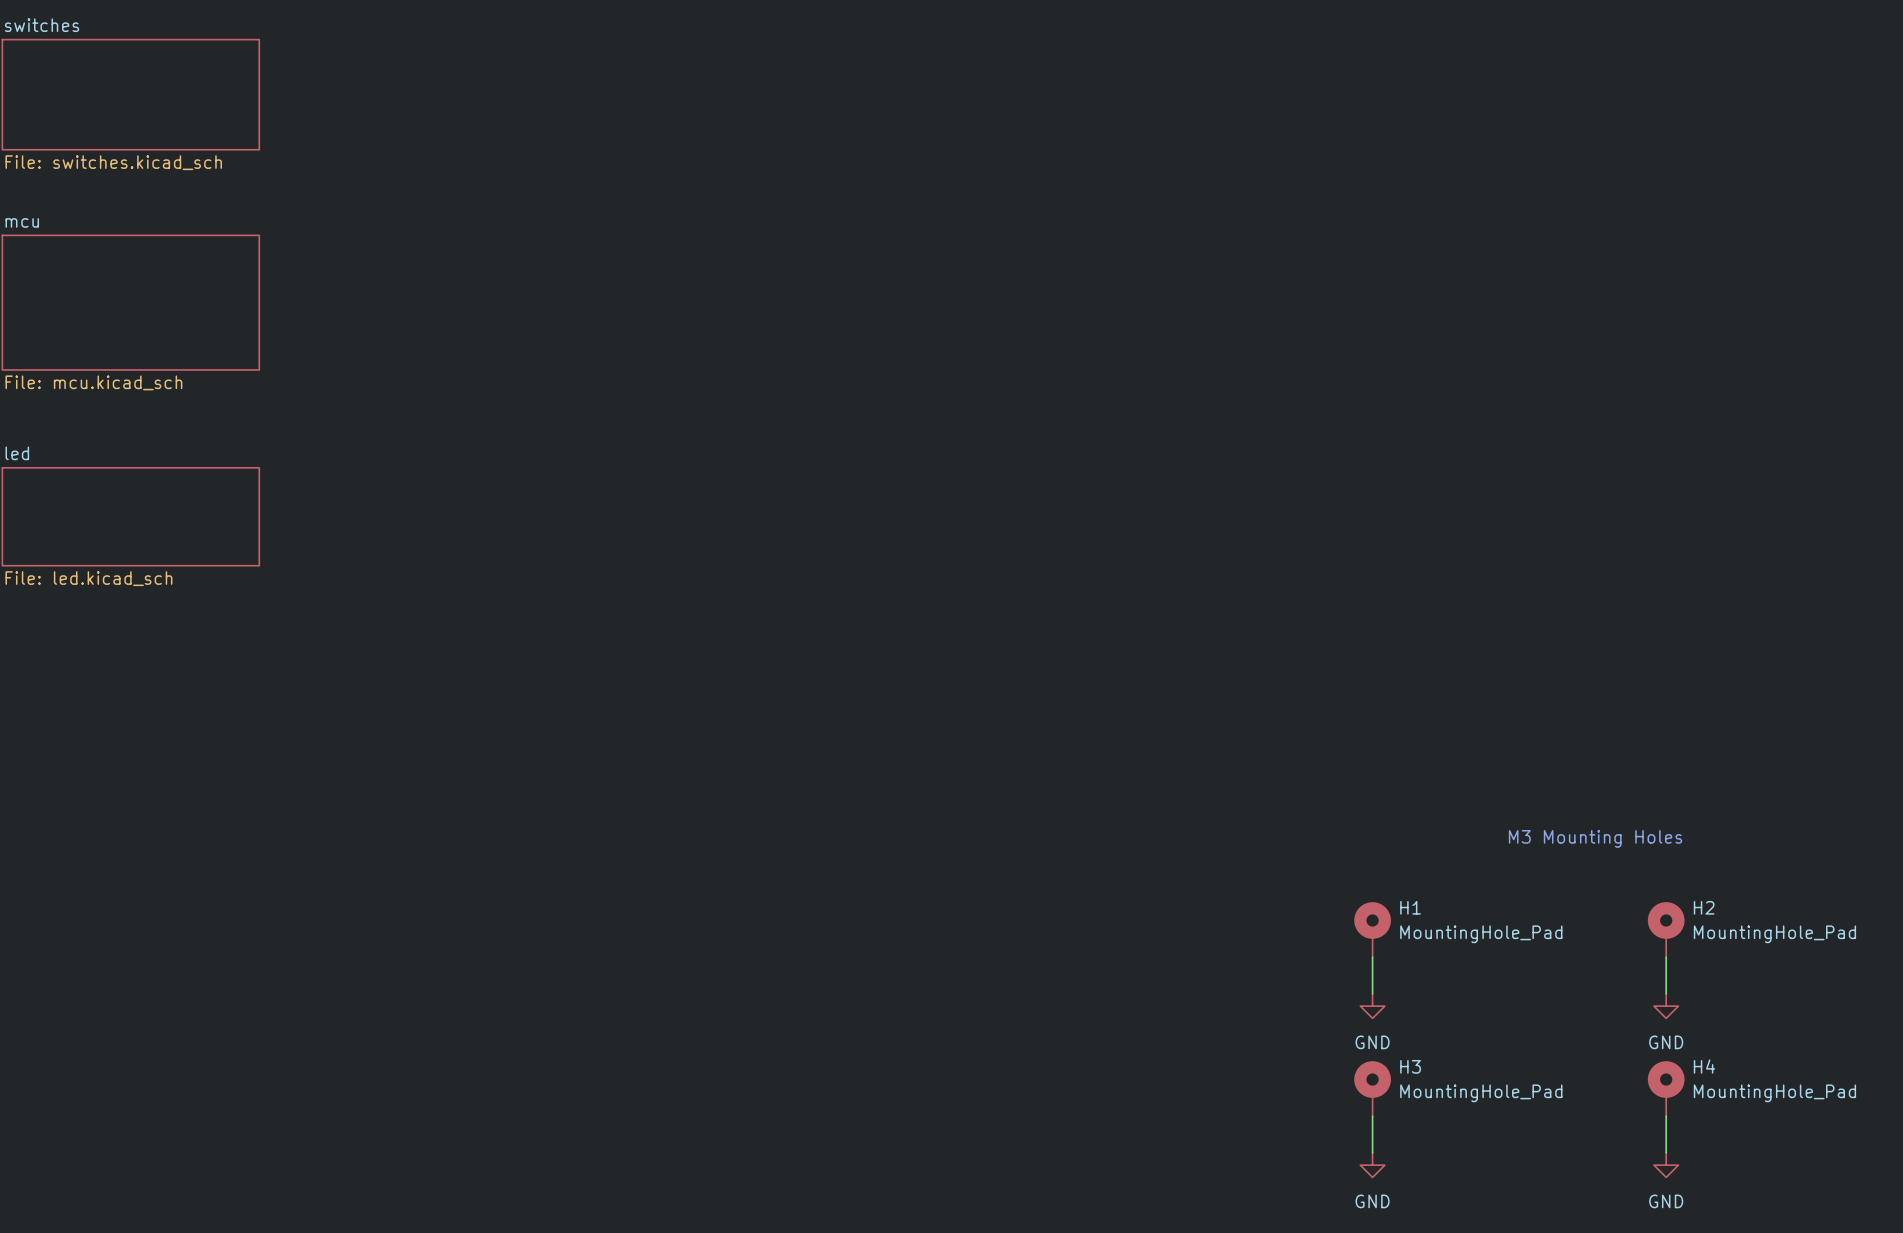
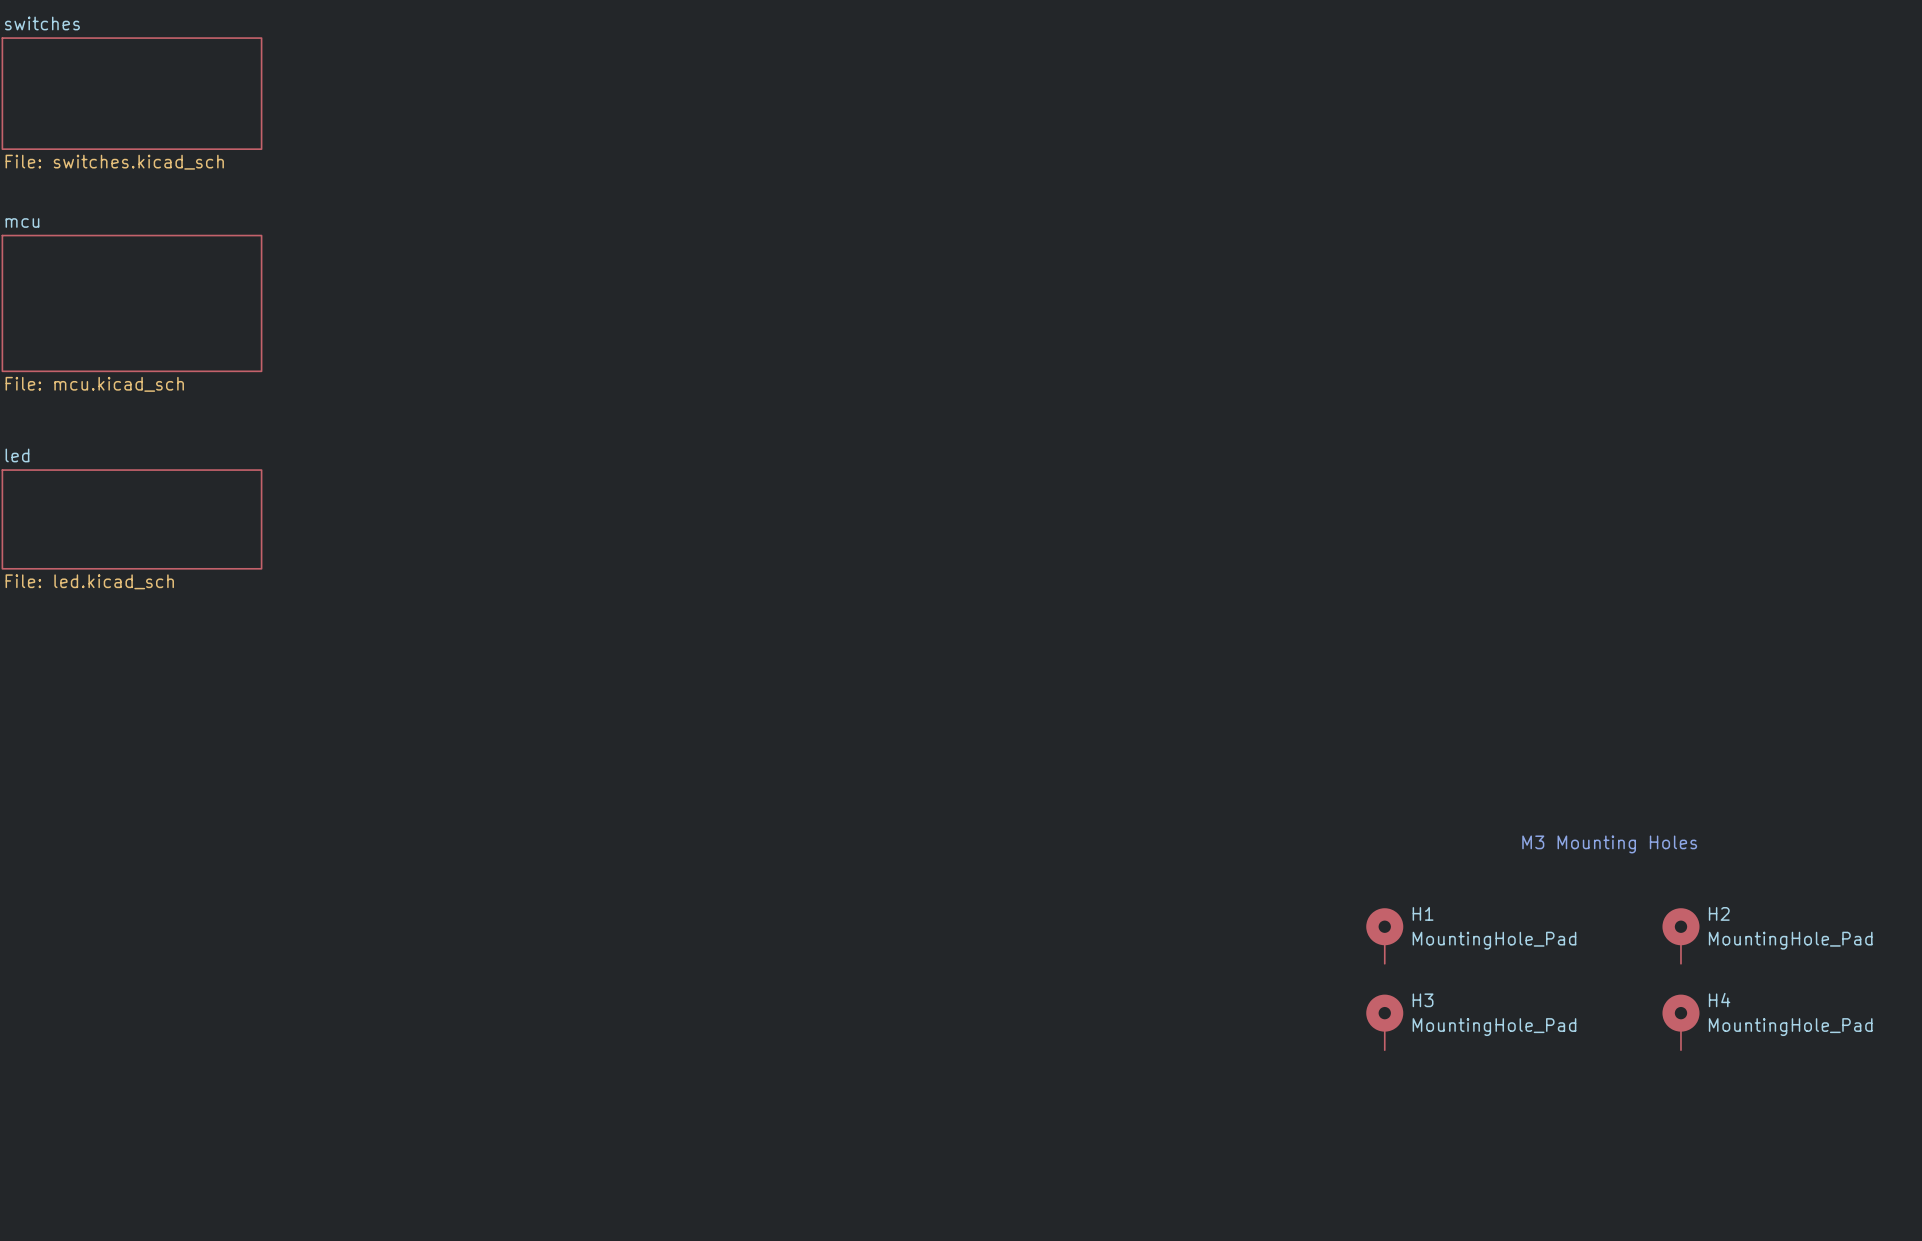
wire: (1372, 957) (1372, 993) -> none
wire: (1666, 957) (1666, 993) -> none
power symbol: GND (1372, 1006) -> none
power symbol: GND (1666, 1006) -> none
H3 position: (1372, 1088) -> (1384, 1022)
H4 position: (1666, 1088) -> (1680, 1022)
wire: (1372, 1116) (1372, 1152) -> none
wire: (1666, 1116) (1666, 1152) -> none
power symbol: GND (1372, 1165) -> none
power symbol: GND (1666, 1165) -> none

